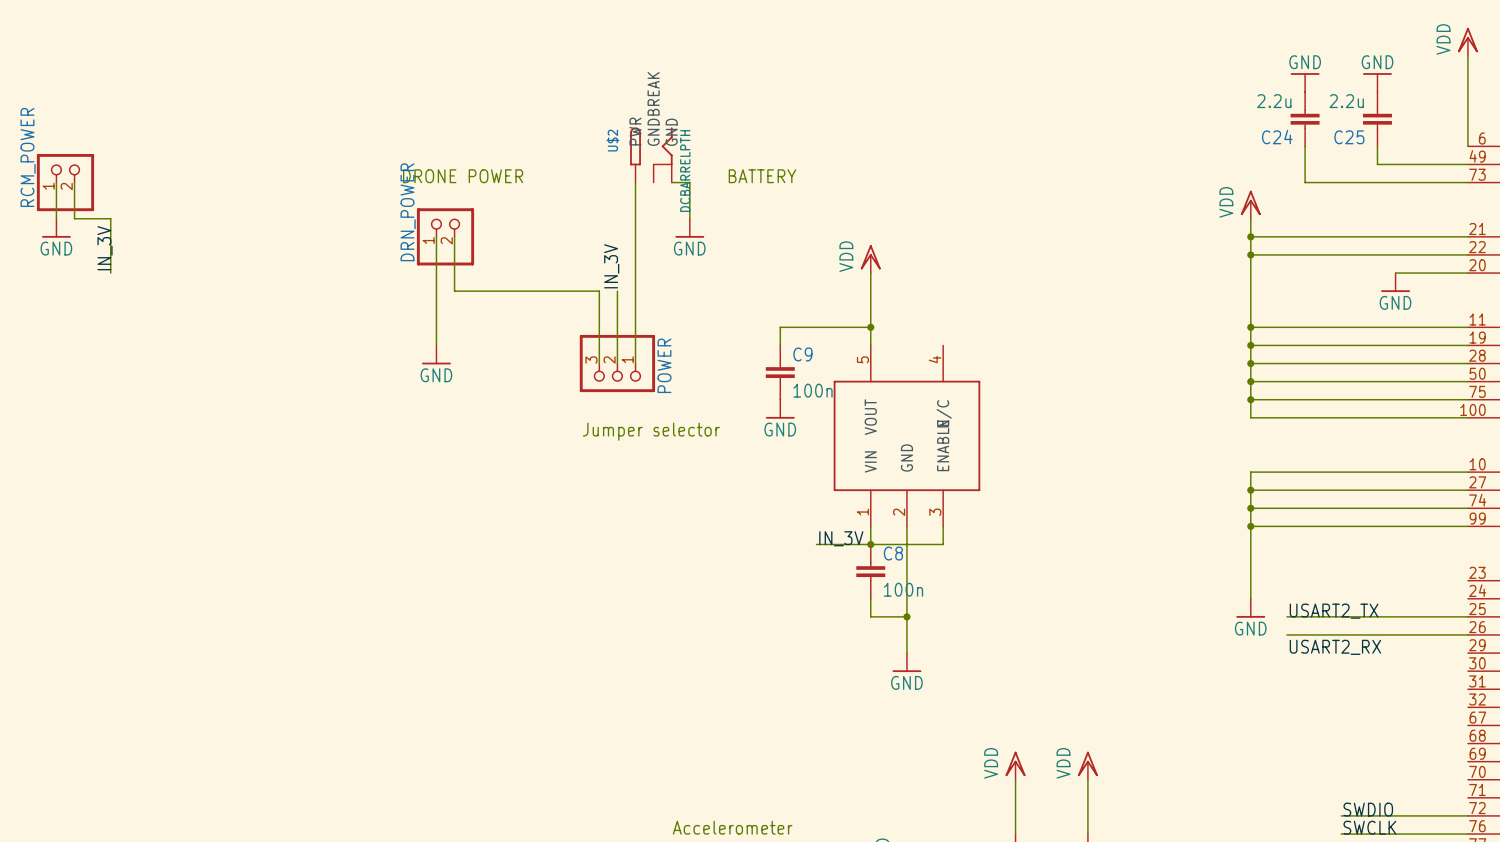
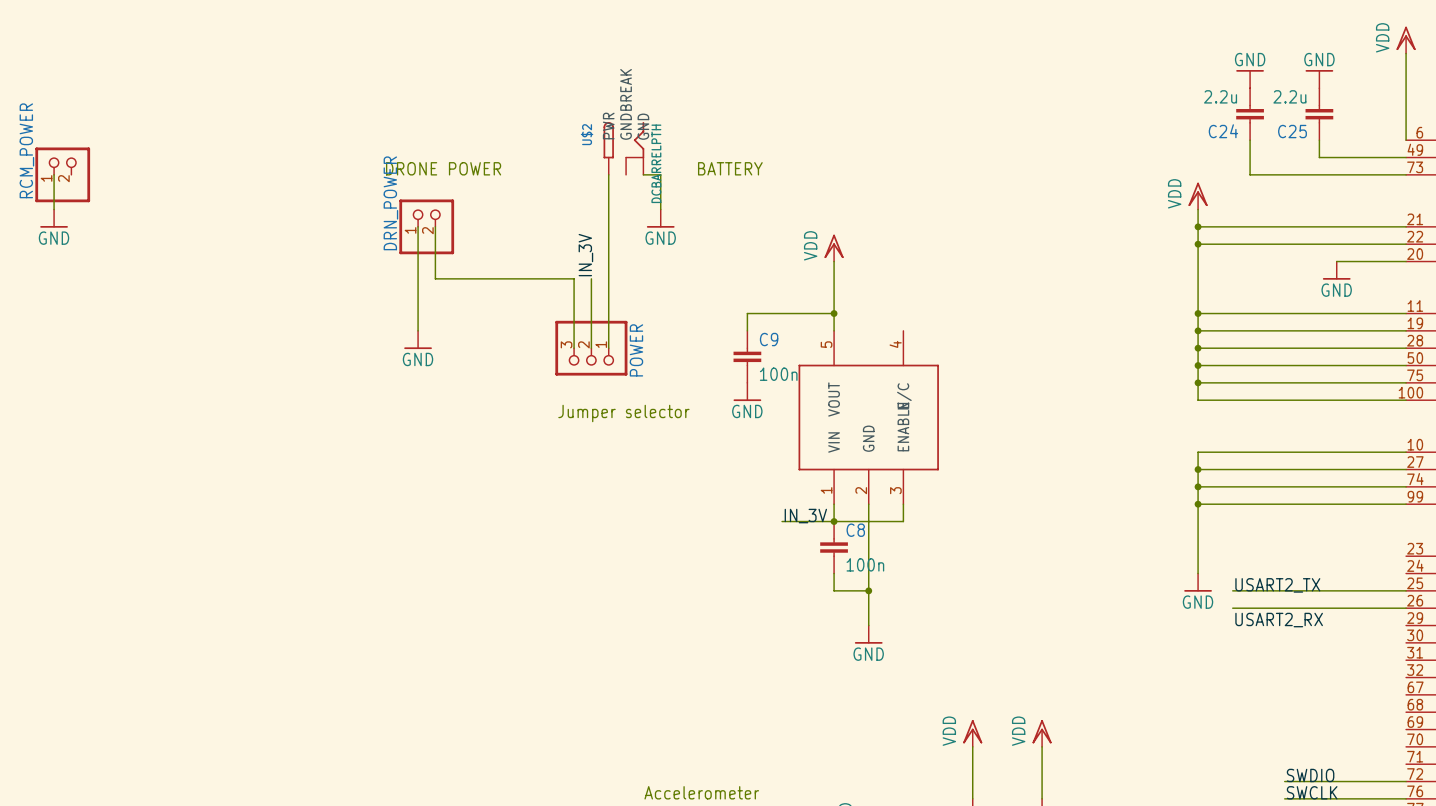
wire: (74, 182) (74, 218) (110, 218) (110, 273) -> none
label: IN_3V (105, 248) -> none

